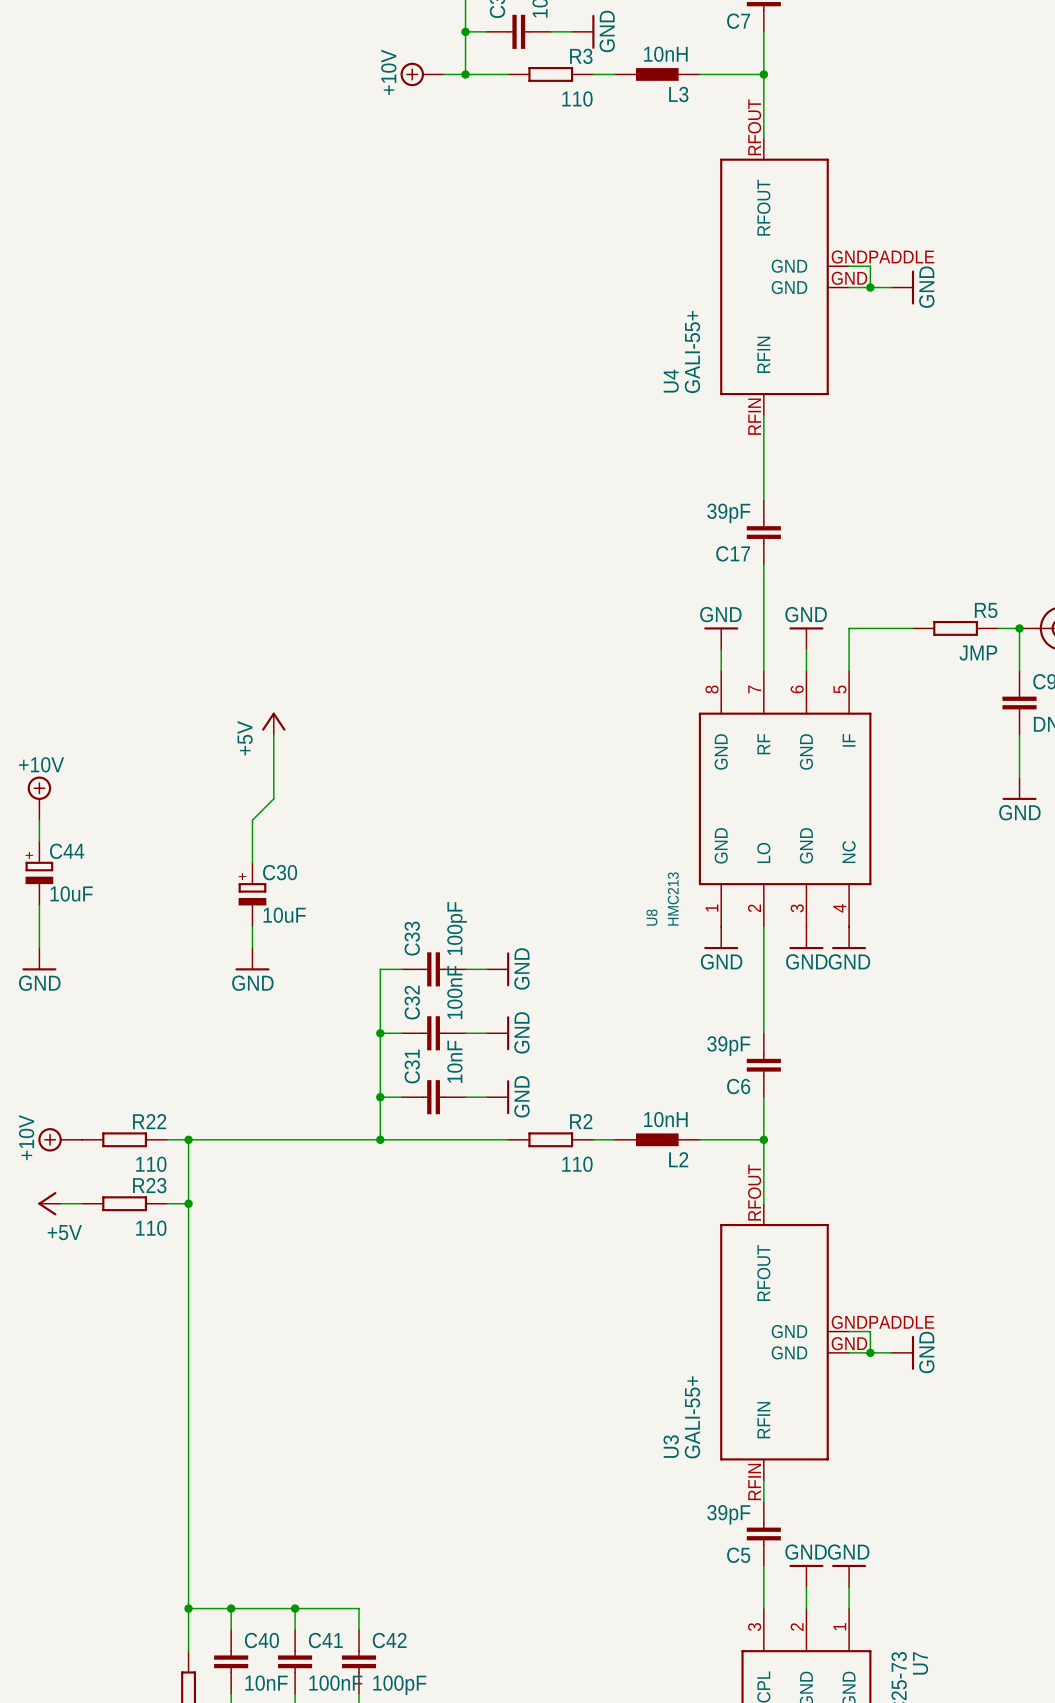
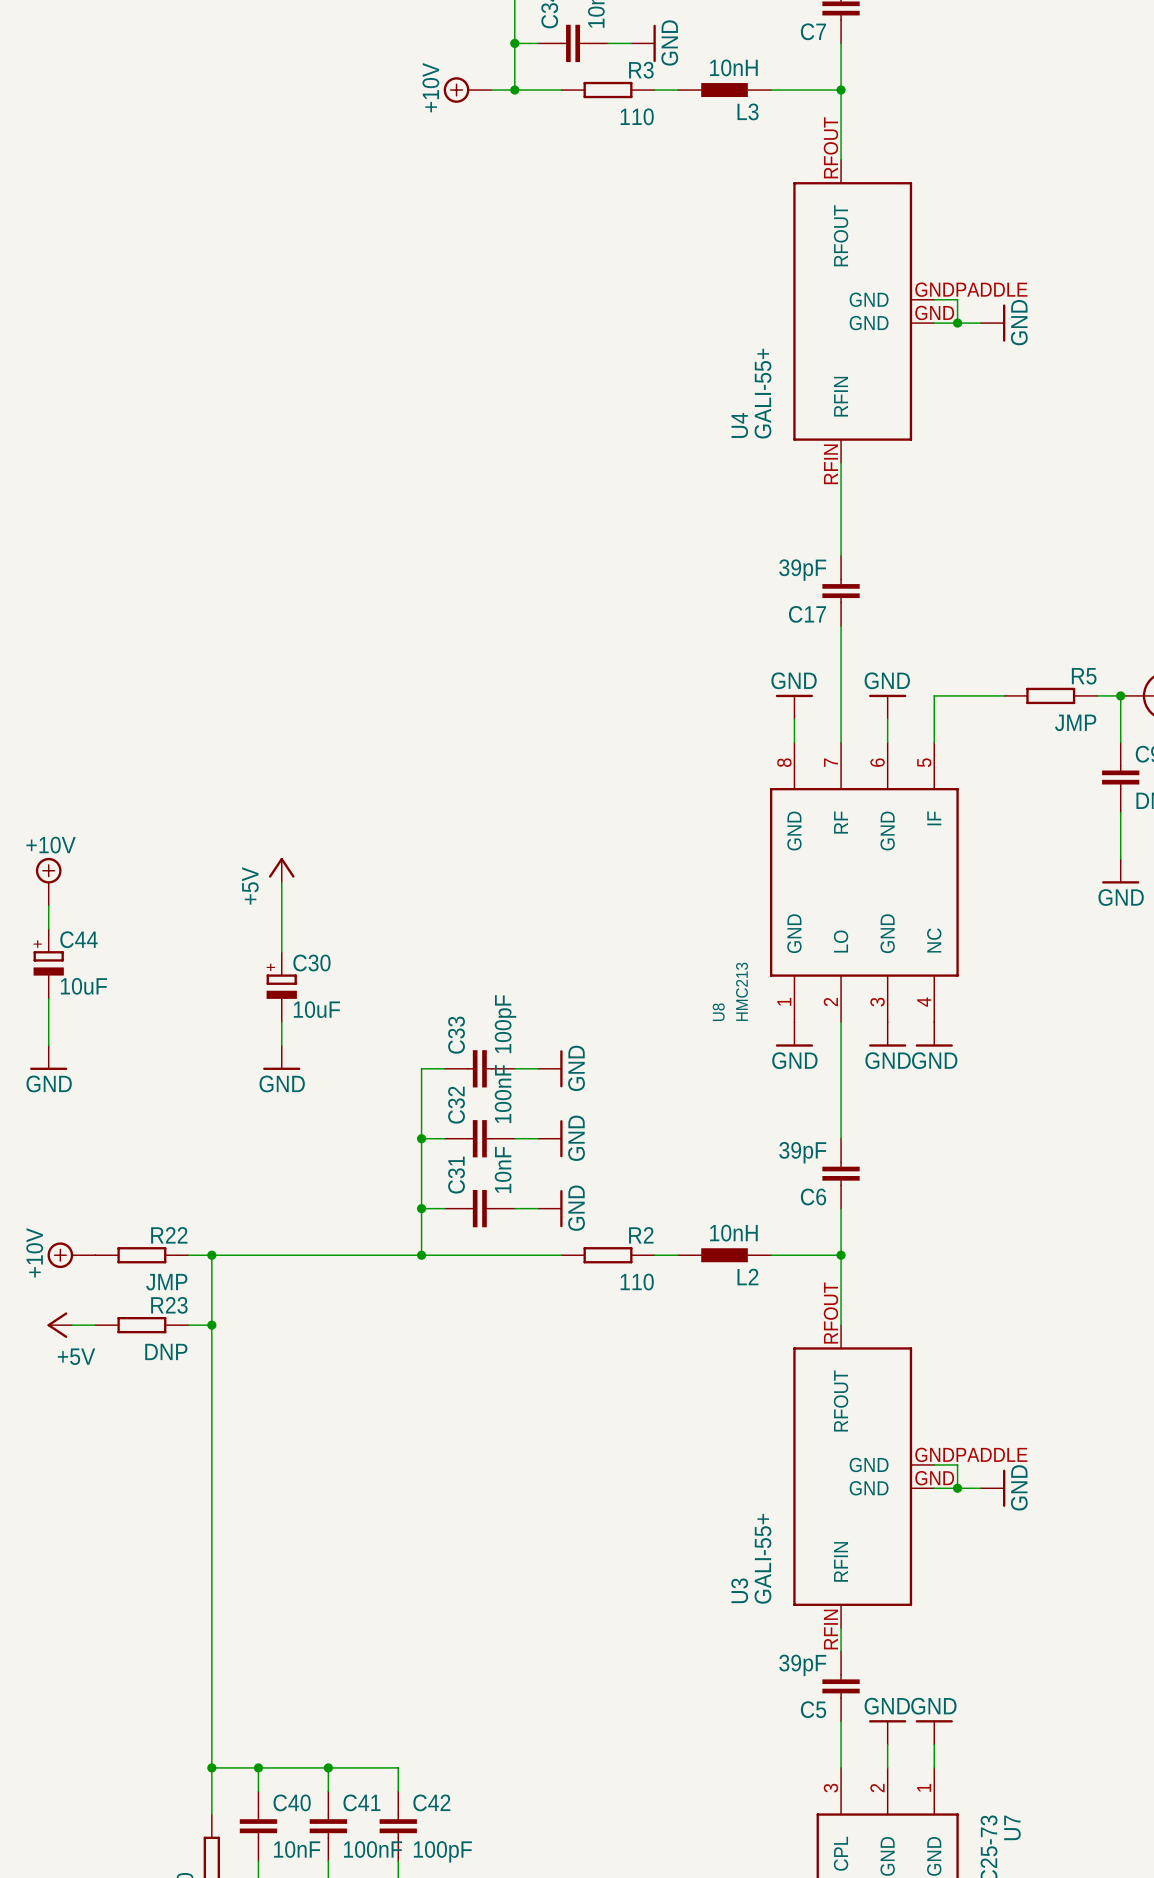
power symbol position: +5V (273, 723) -> +5V (281, 870)
wire: (273, 734) (273, 798) (252, 820) -> (281, 882) (281, 905)
R22 value: 110 (151, 1164) -> JMP (166, 1282)
R23 value: 110 (151, 1228) -> DNP (166, 1351)

